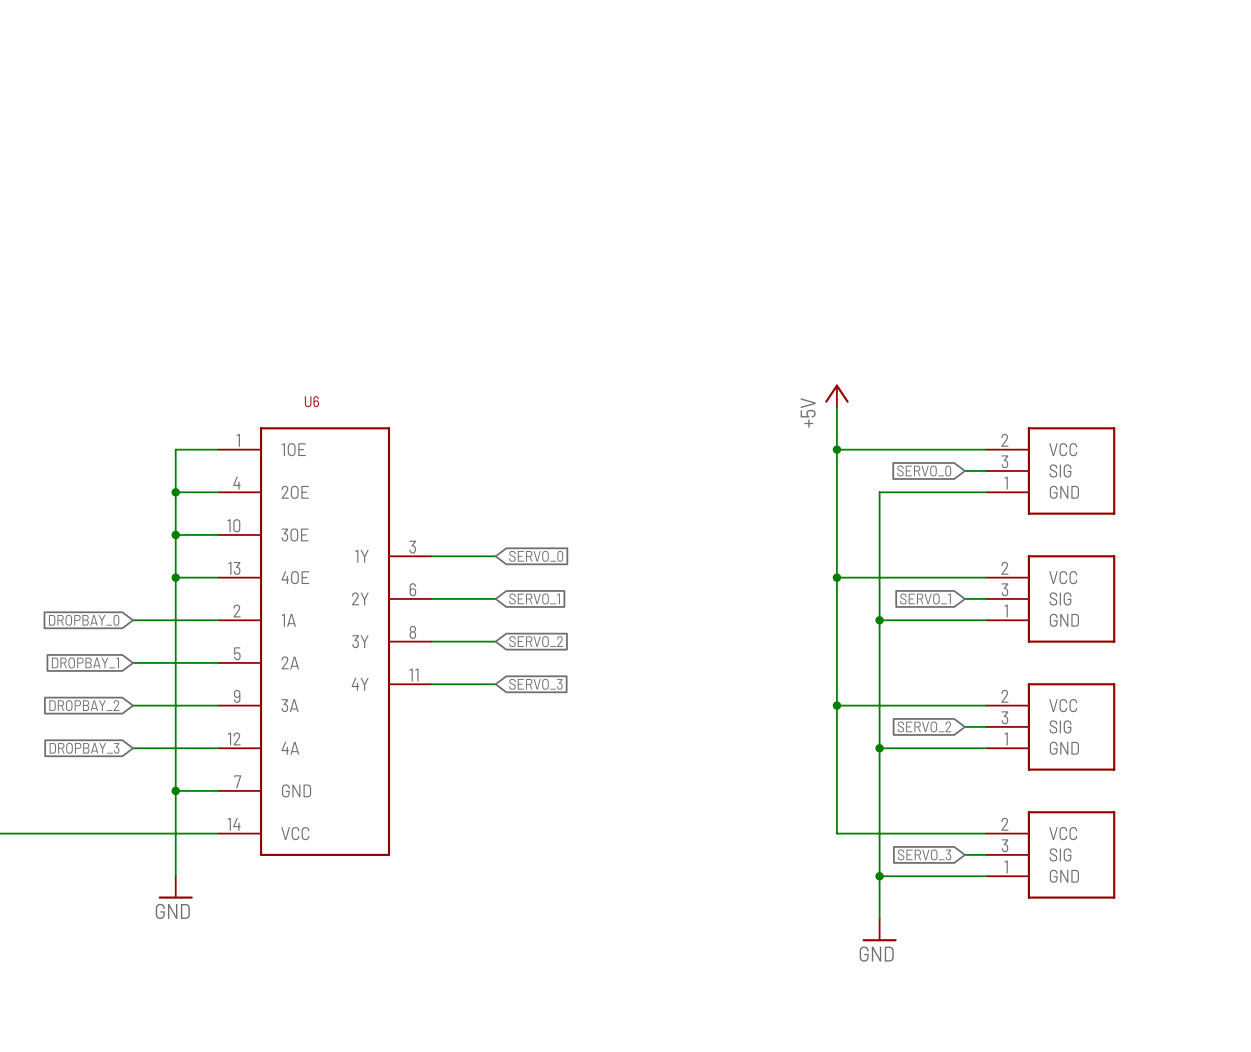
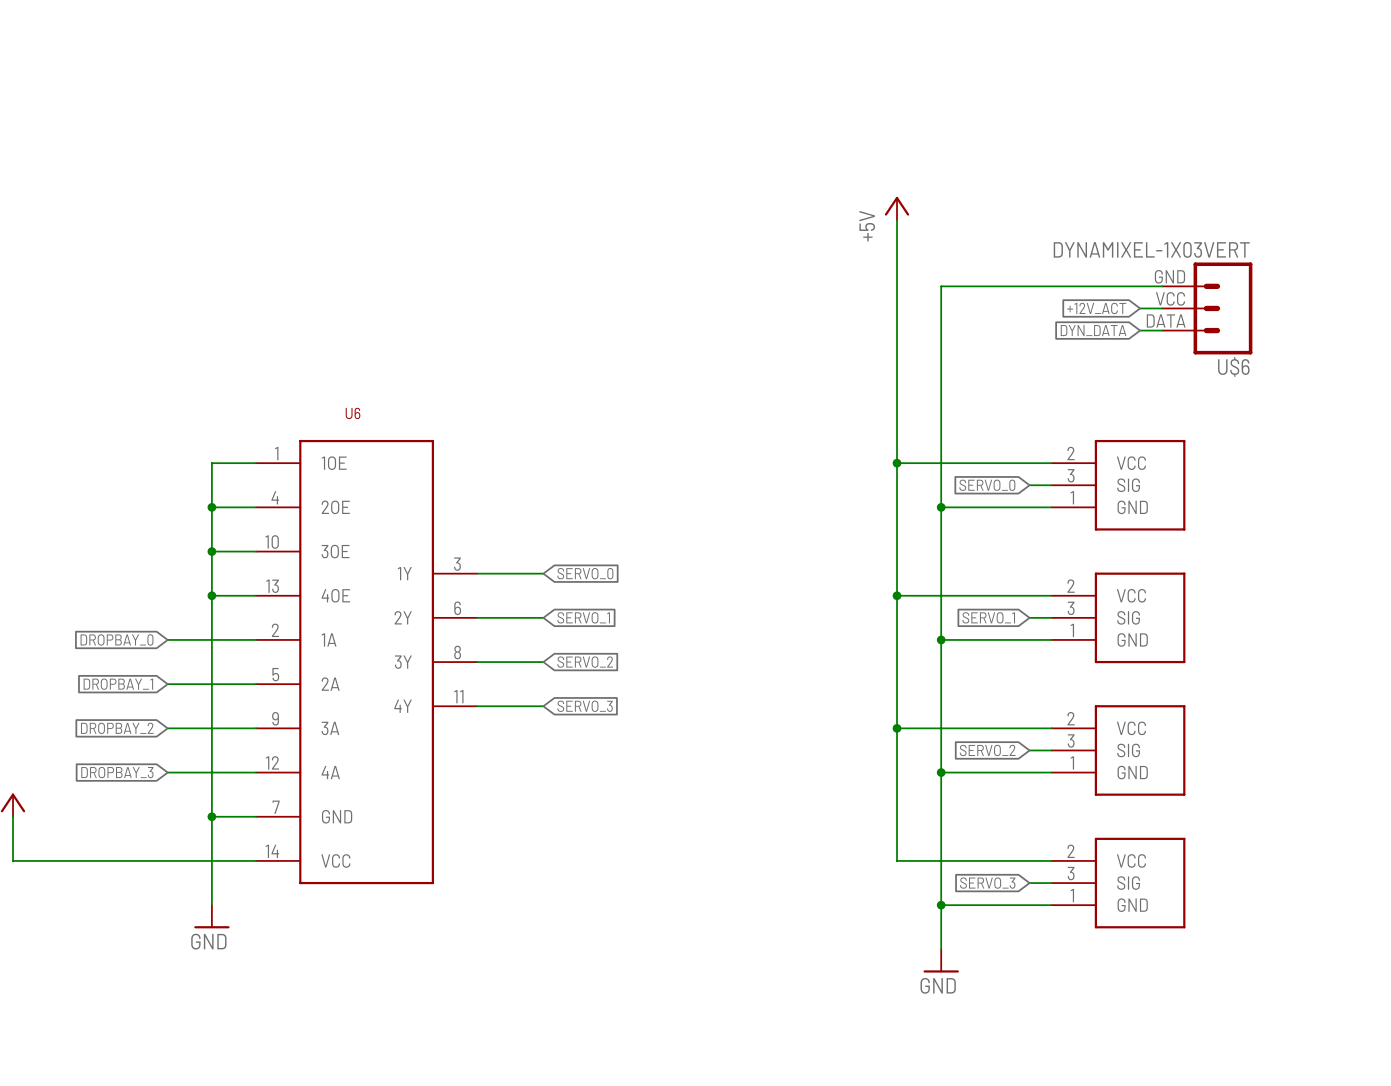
wire: none -> (897, 220) (897, 418)
wire: none -> (1162, 286) (941, 286) (941, 507)
global label: none -> +12V_ACT (1096, 308)
wire: none -> (1140, 308) (1162, 308)
U$6: none -> DYNAMIXEL-1X03VERT (1207, 308)
global label: none -> DYN_DATA (1093, 330)
wire: none -> (1140, 330) (1162, 330)
power symbol position: +5V (836, 395) -> +5V (897, 208)
junction: none -> (941, 507)

